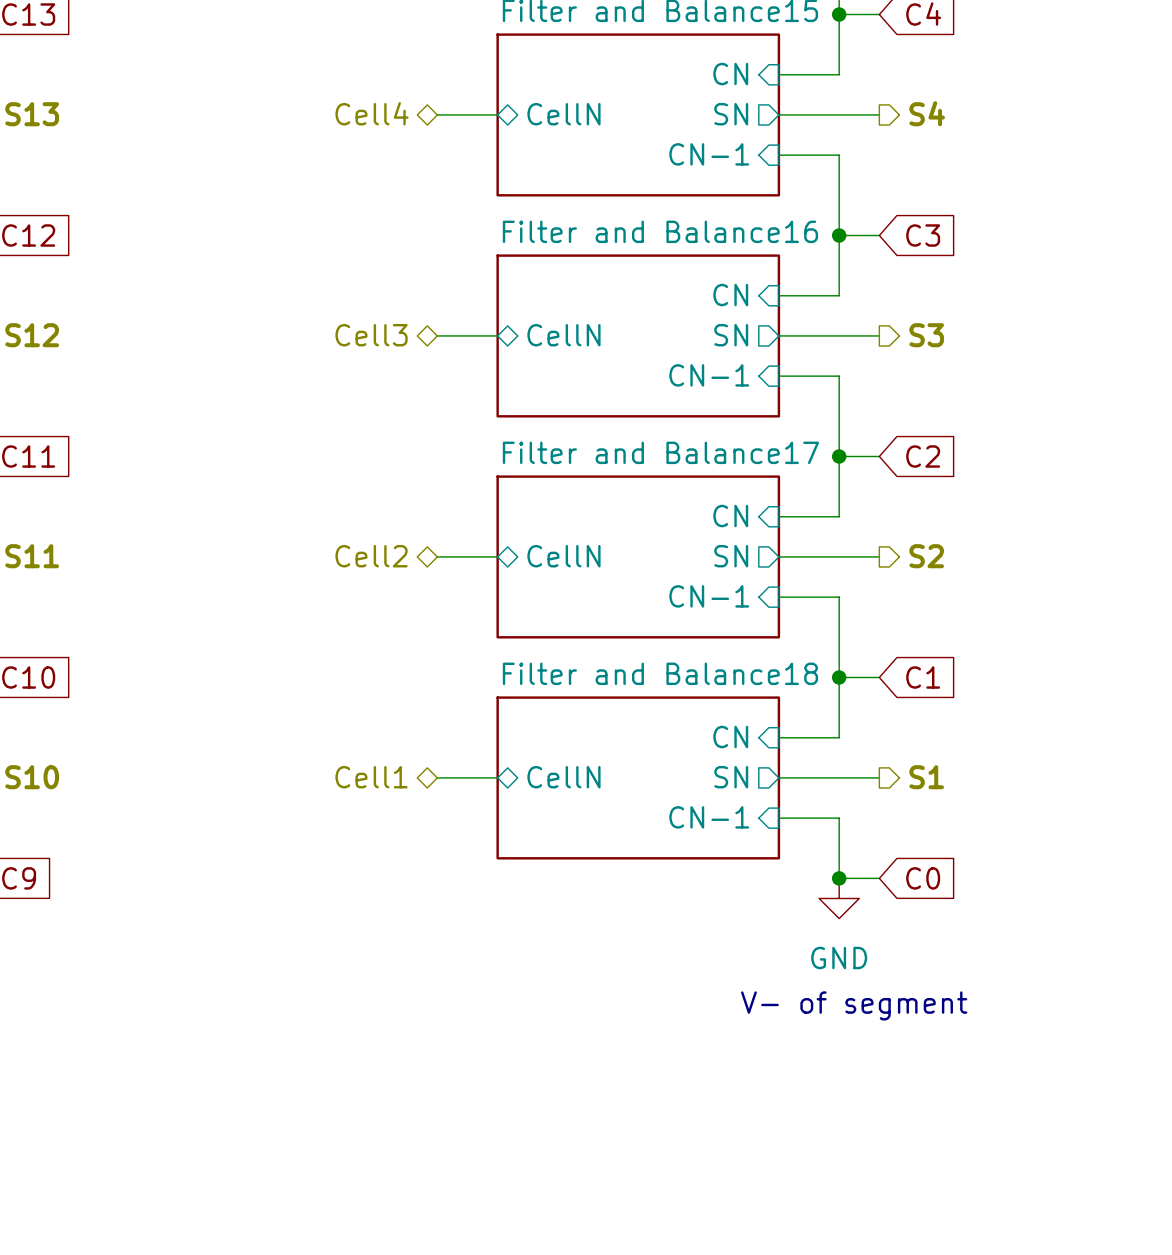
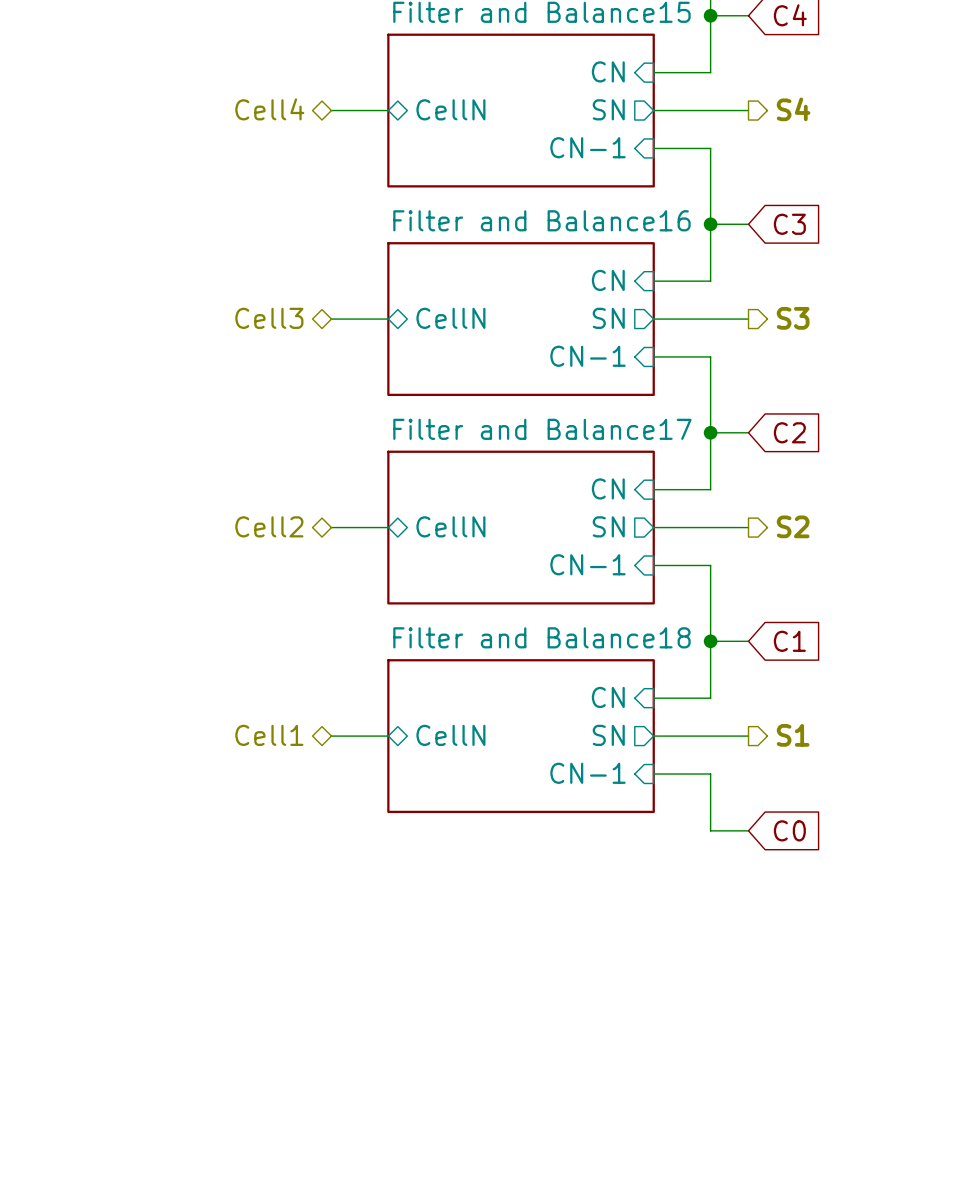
junction: (839, 878) -> none
power symbol: GND (839, 898) -> none
text: V- of segment (854, 1005) -> none

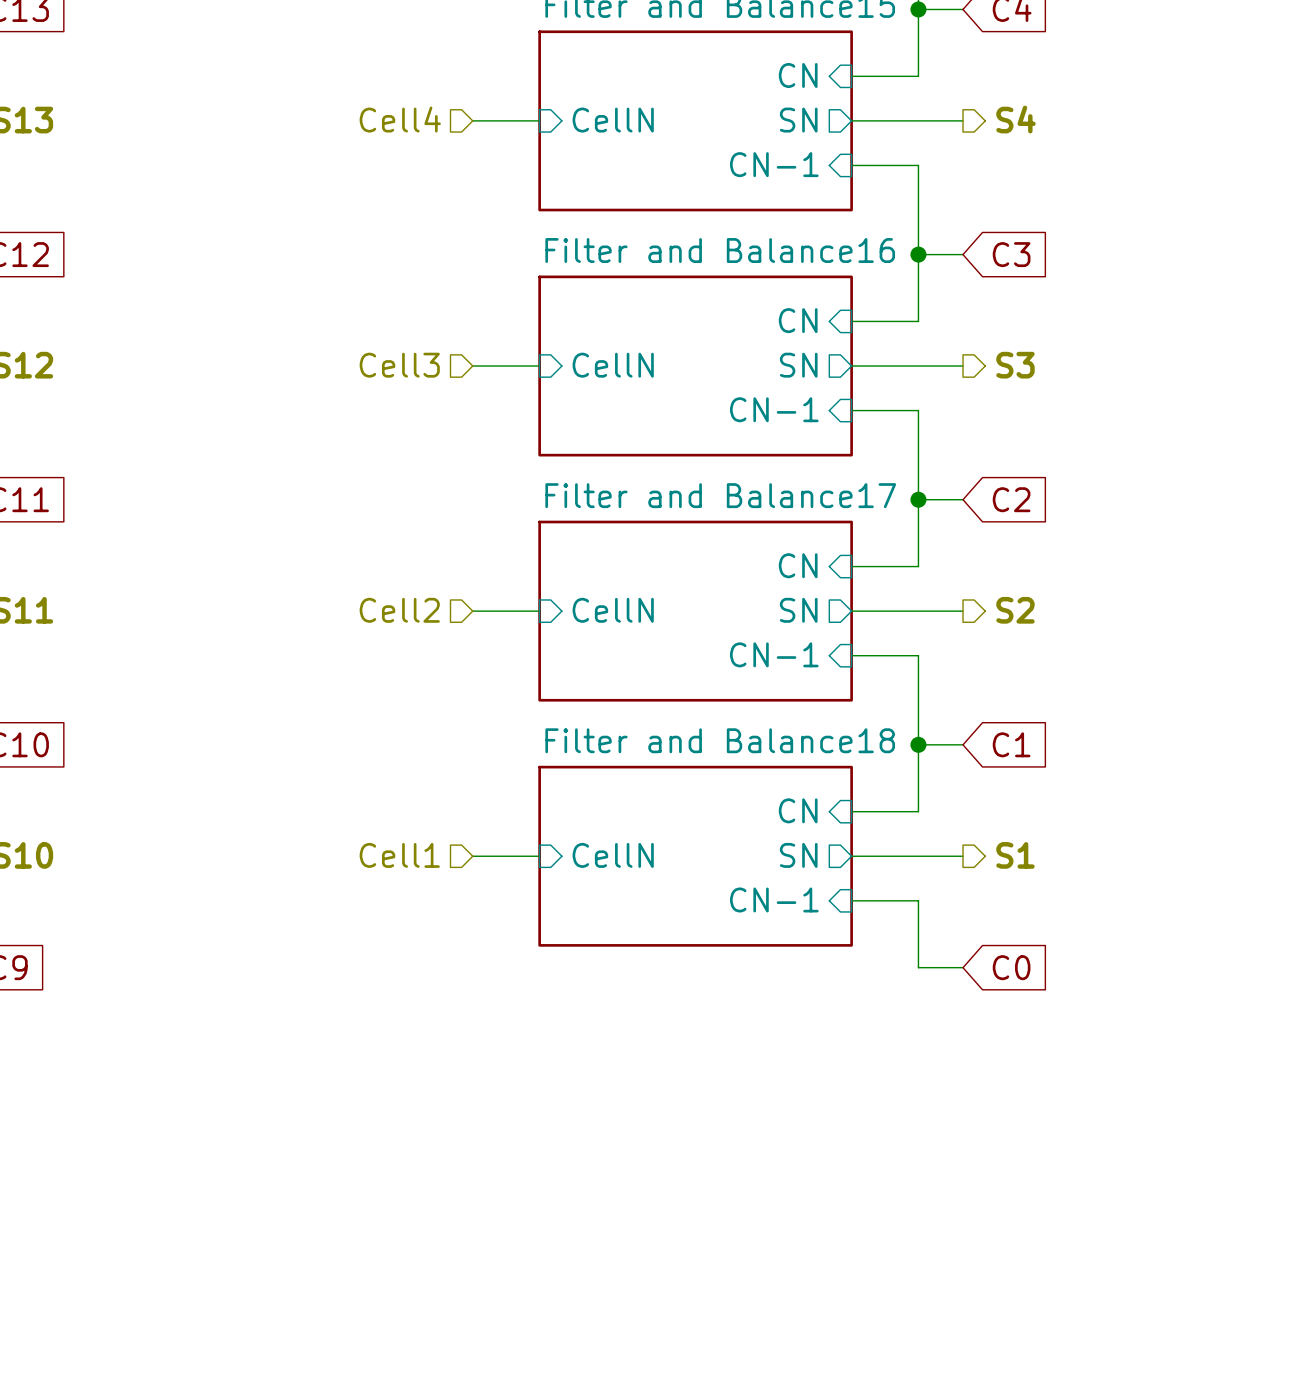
hierarchical label shape: bidirectional (269, 109) -> input (400, 119)
sheet pin shape: bidirectional (450, 109) -> input (613, 120)
hierarchical label shape: bidirectional (269, 318) -> input (399, 365)
sheet pin shape: bidirectional (450, 318) -> input (613, 365)
hierarchical label shape: bidirectional (269, 526) -> input (399, 610)
sheet pin shape: bidirectional (450, 526) -> input (613, 610)
hierarchical label shape: bidirectional (269, 735) -> input (399, 855)
sheet pin shape: bidirectional (450, 735) -> input (613, 855)

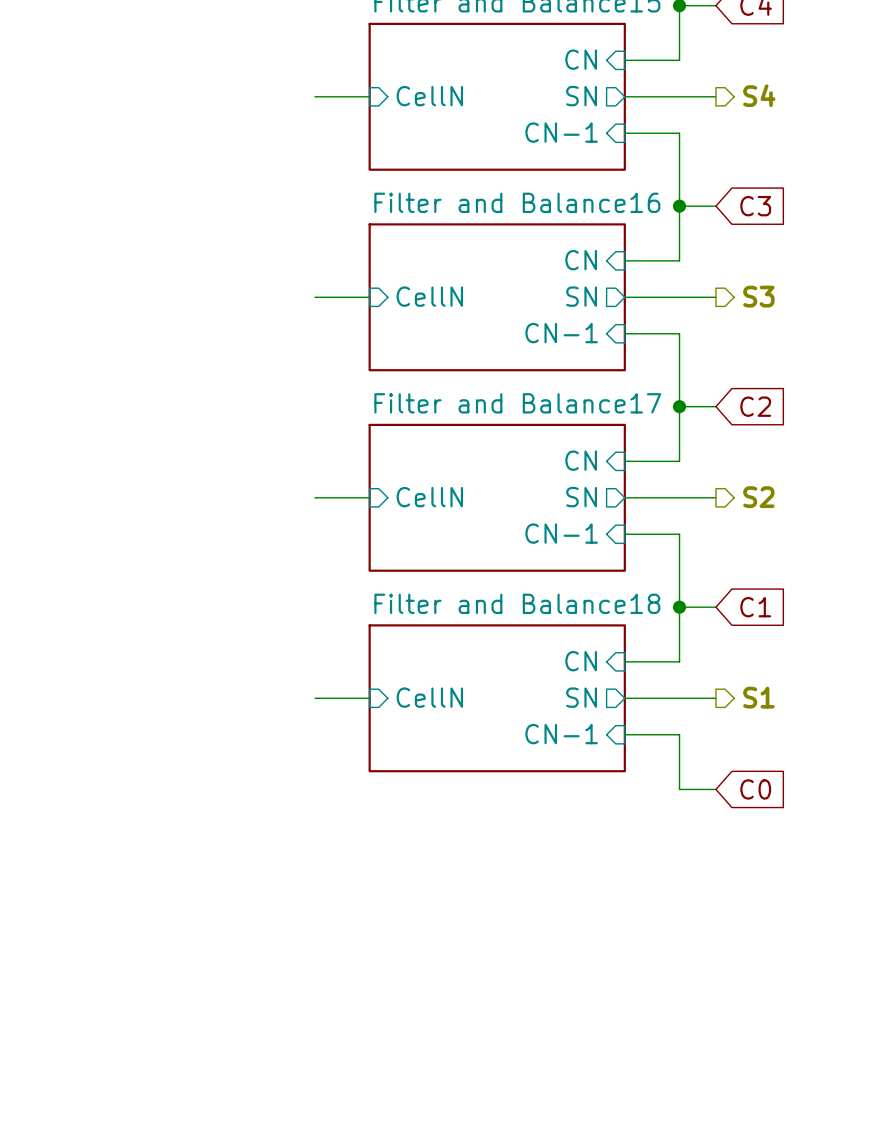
hierarchical label: Cell4 (400, 119) -> none
hierarchical label: Cell3 (399, 365) -> none
hierarchical label: Cell2 (399, 610) -> none
hierarchical label: Cell1 (399, 855) -> none

